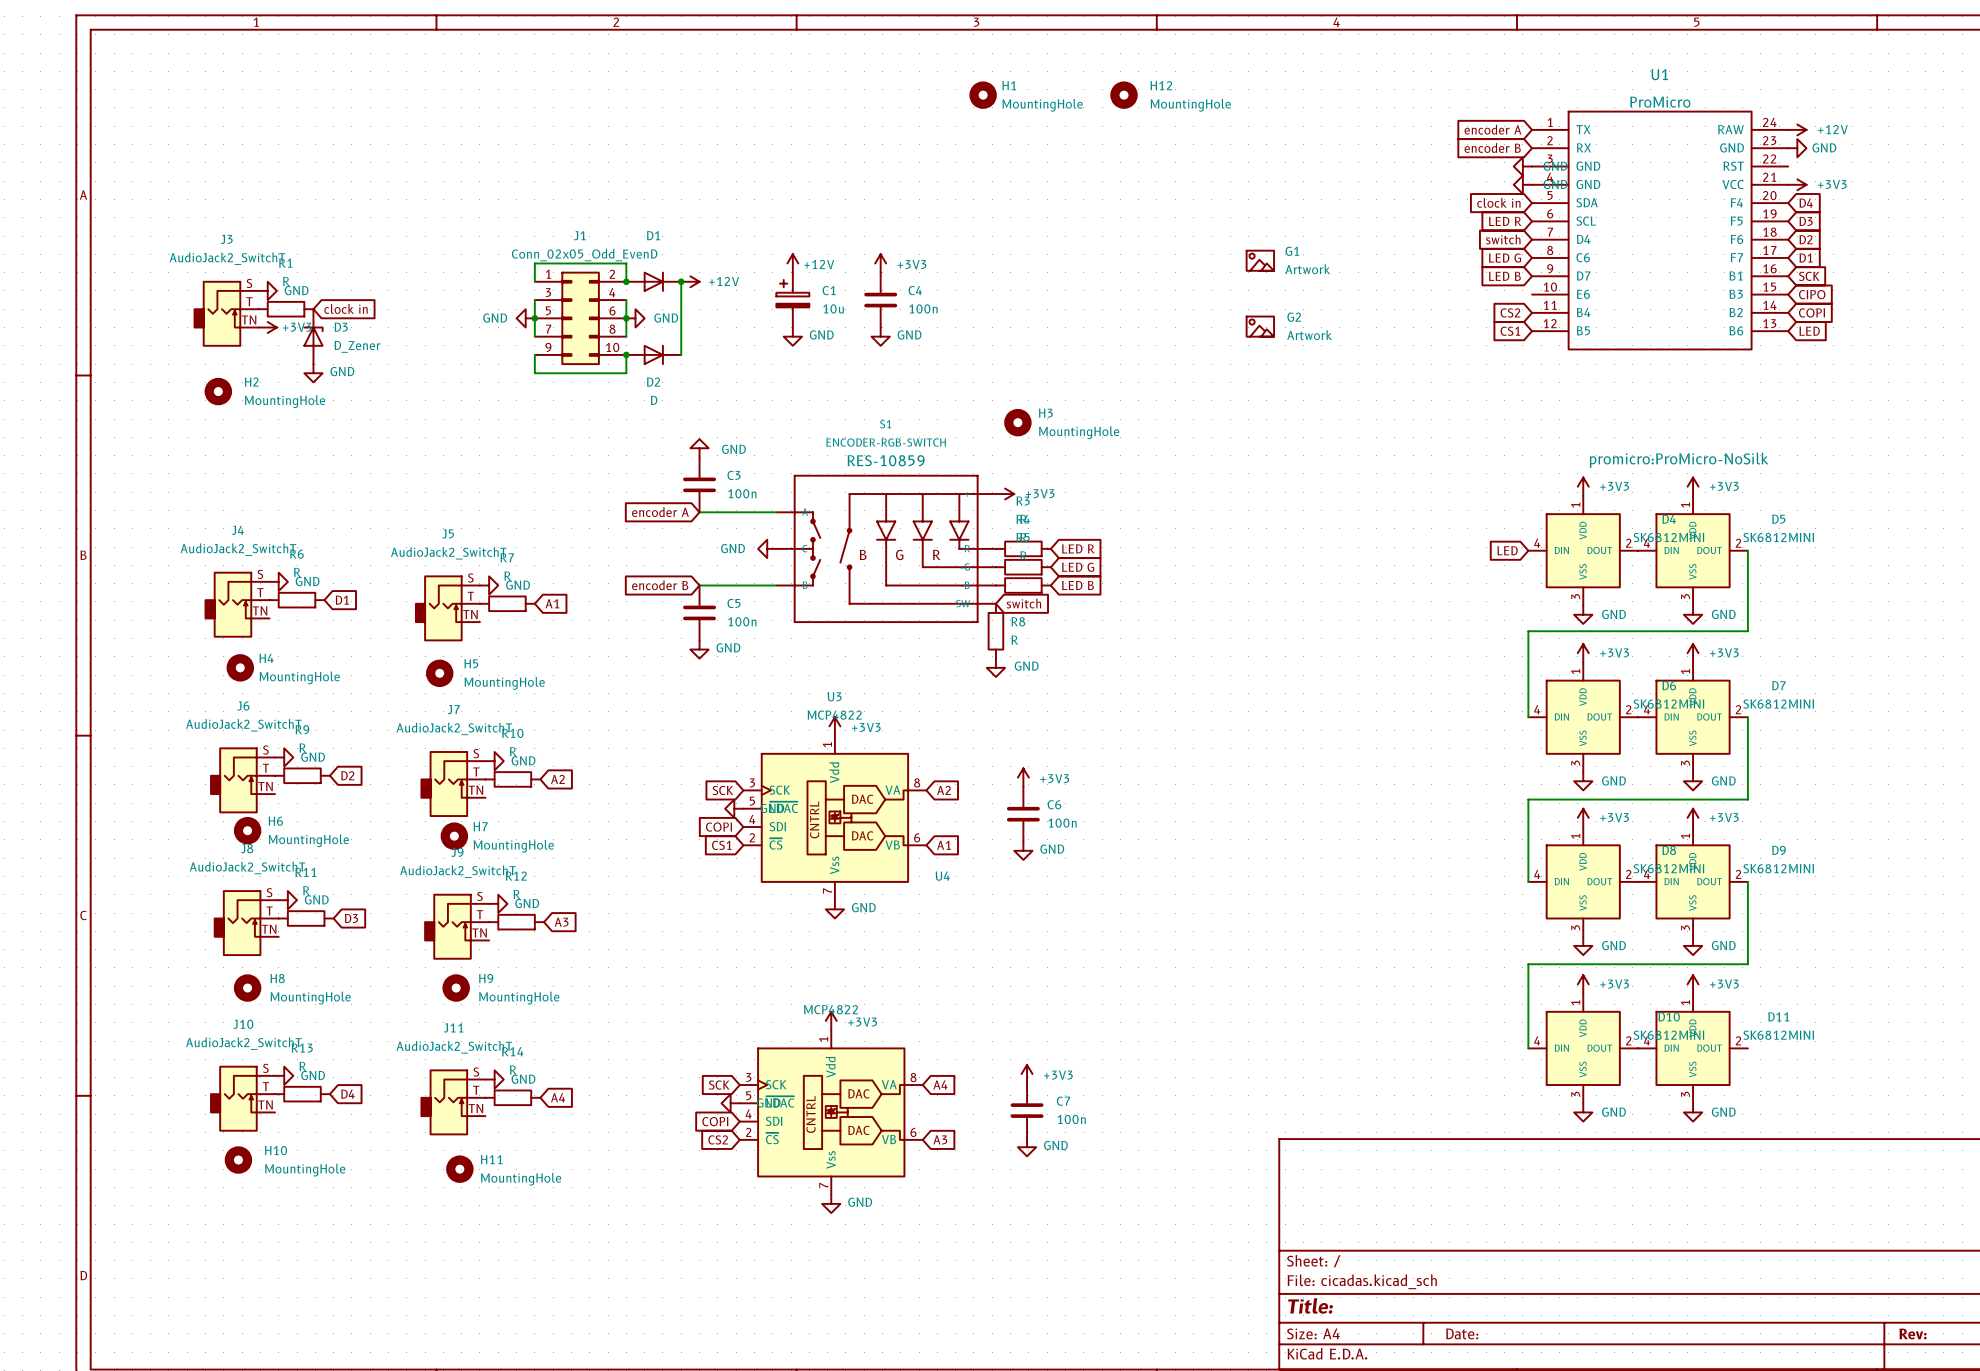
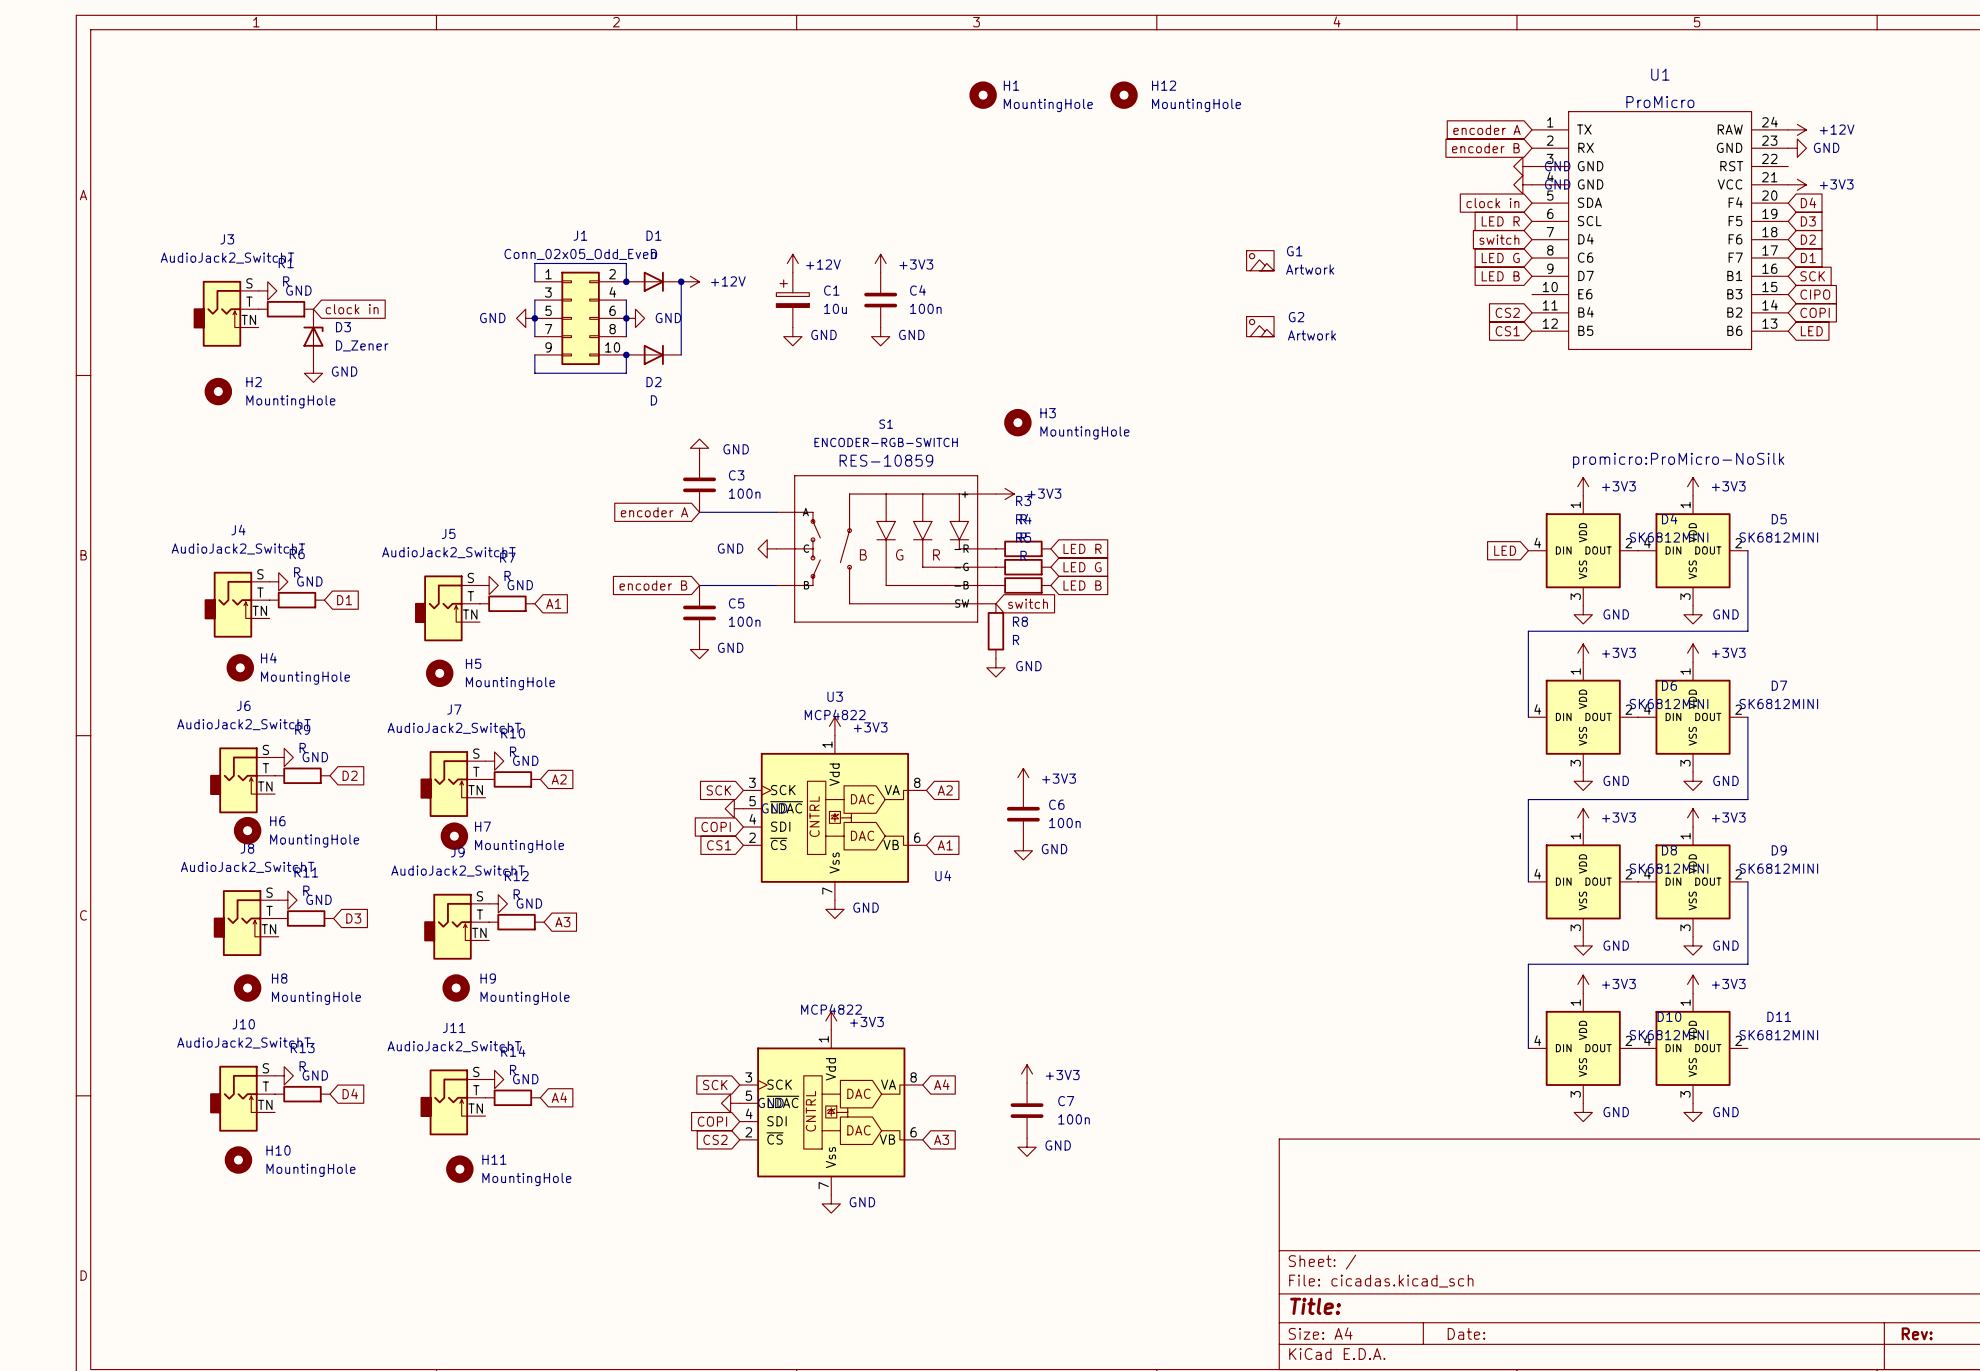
power symbol: +3V3 (267, 327) -> none

